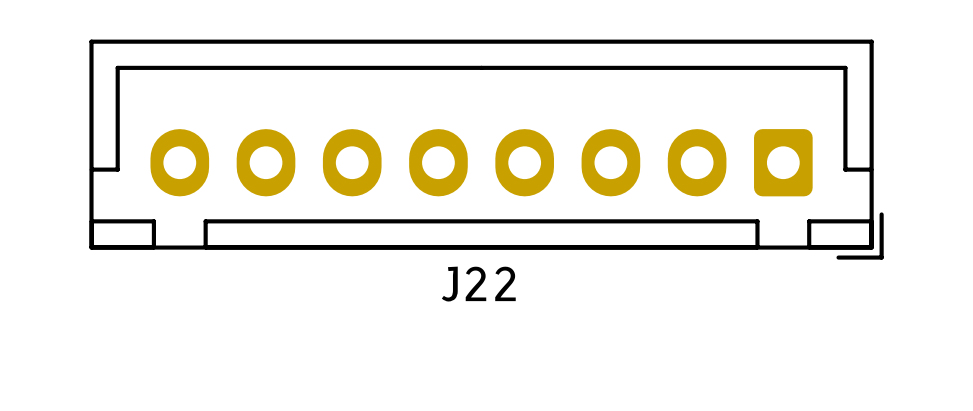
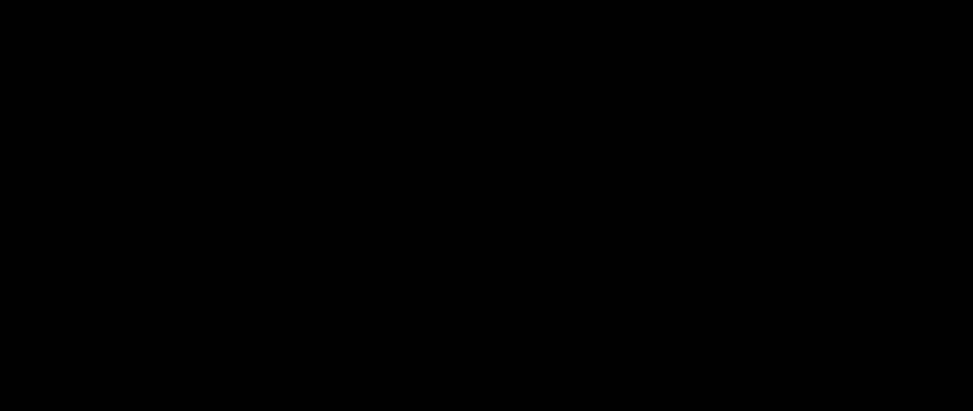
J22: (486, 149) -> none

